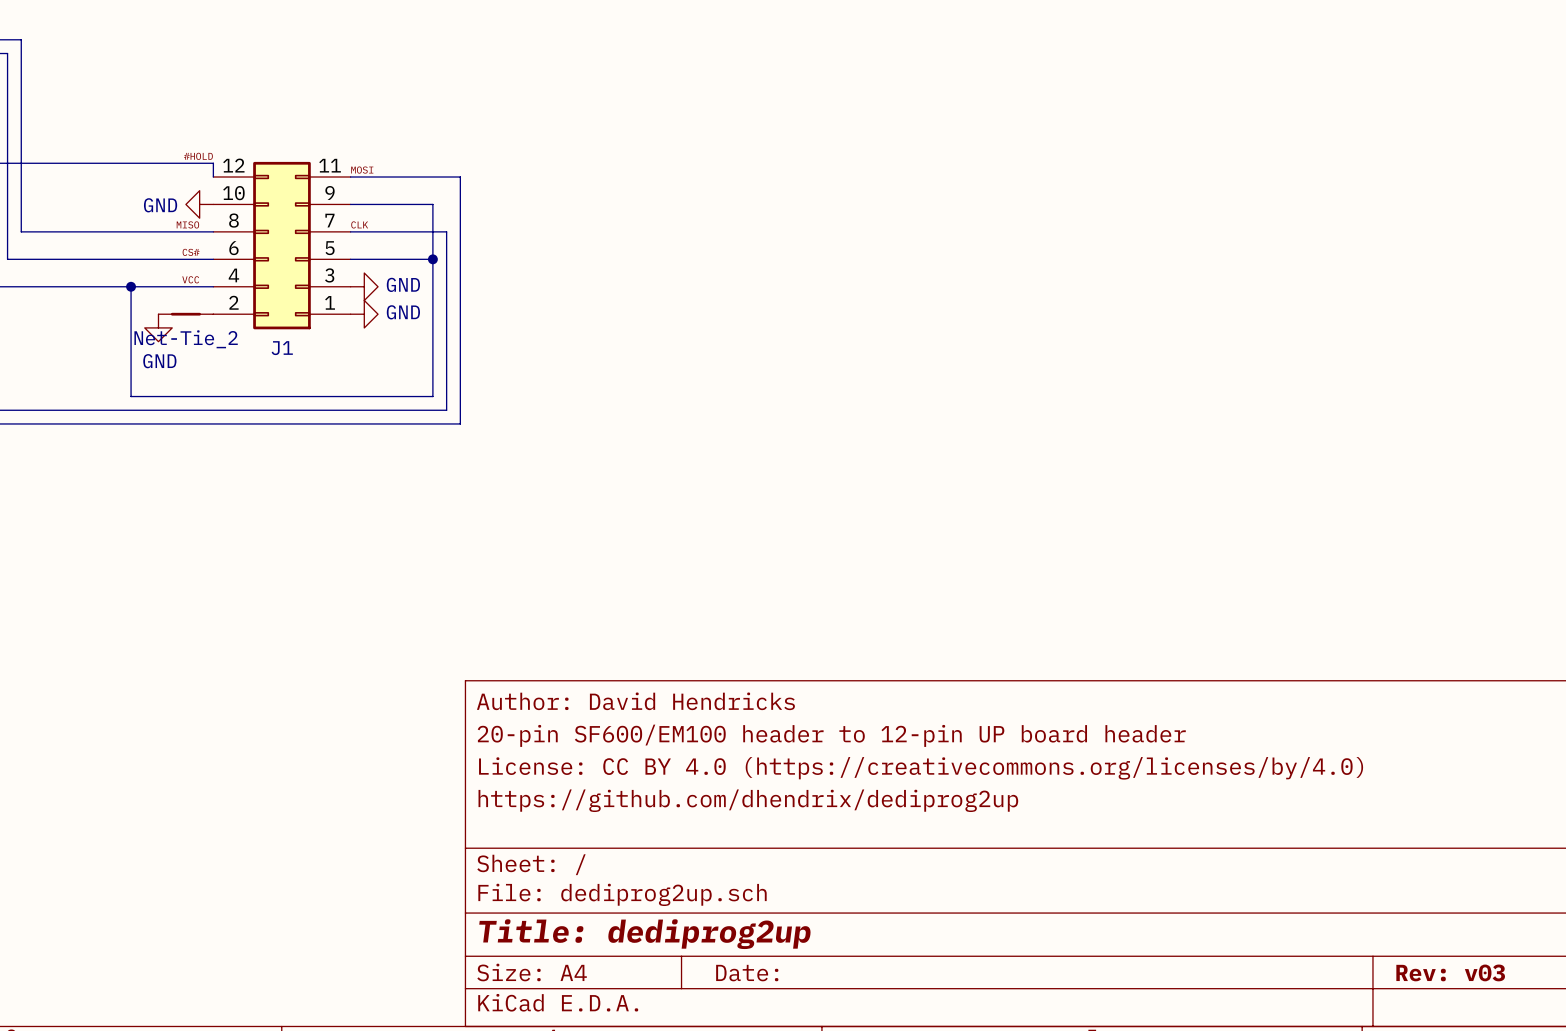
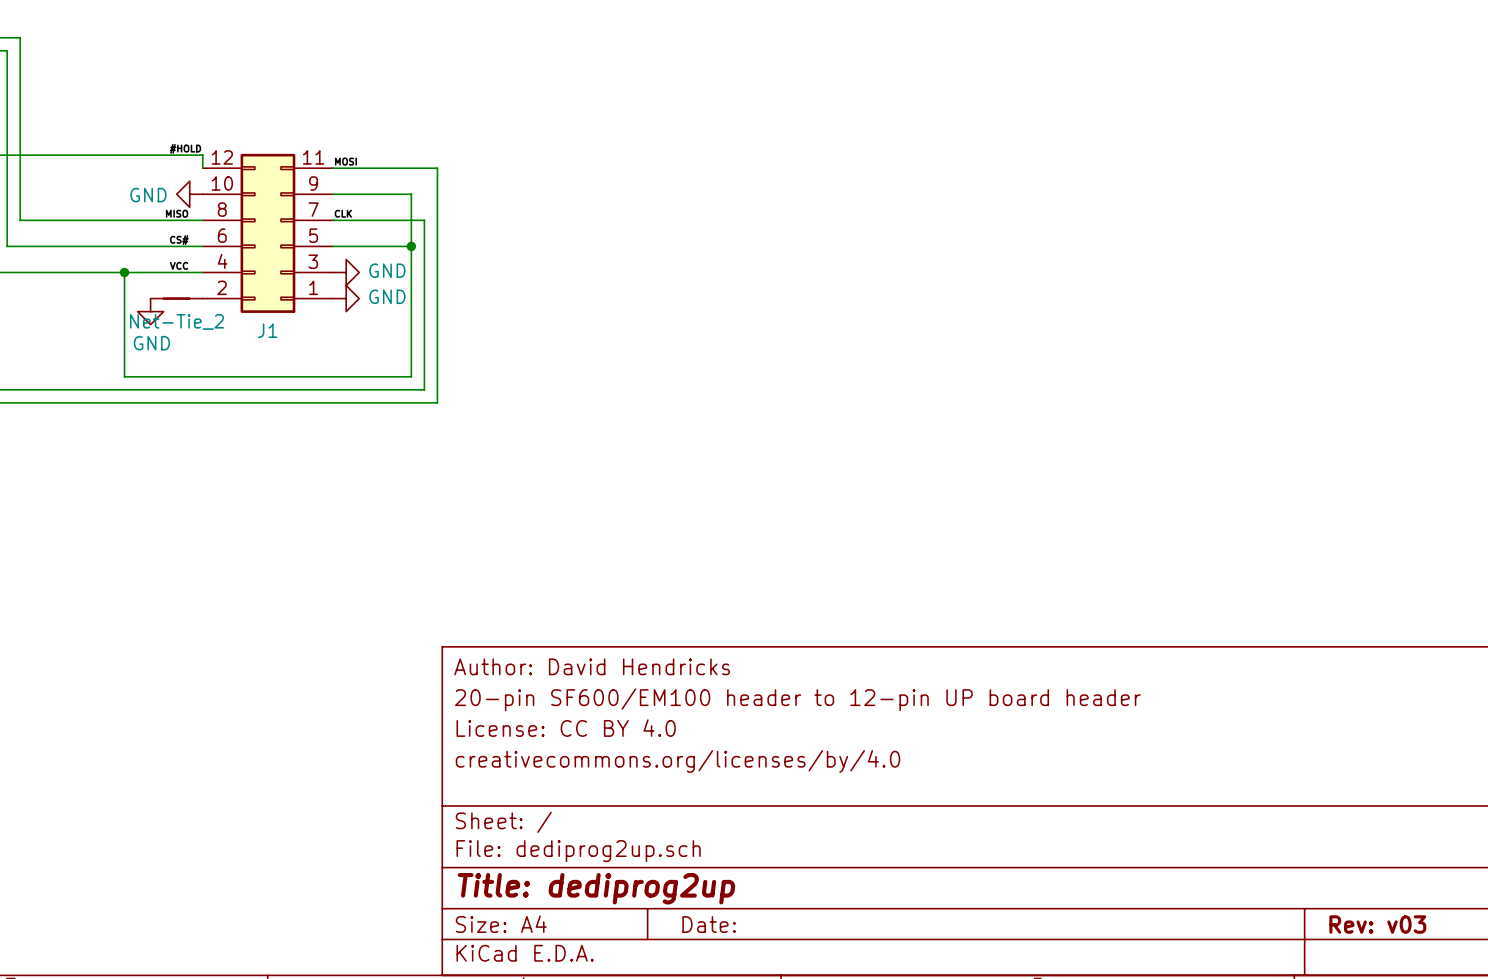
title block: License: CC BY 4.0 (https://creativecommons.org/licenses/by/4.0) (921, 768) -> License: CC BY 4.0 (566, 728)
title block: https://github.com/dhendrix/dediprog2up (748, 800) -> creativecommons.org/licenses/by/4.0 (677, 761)

